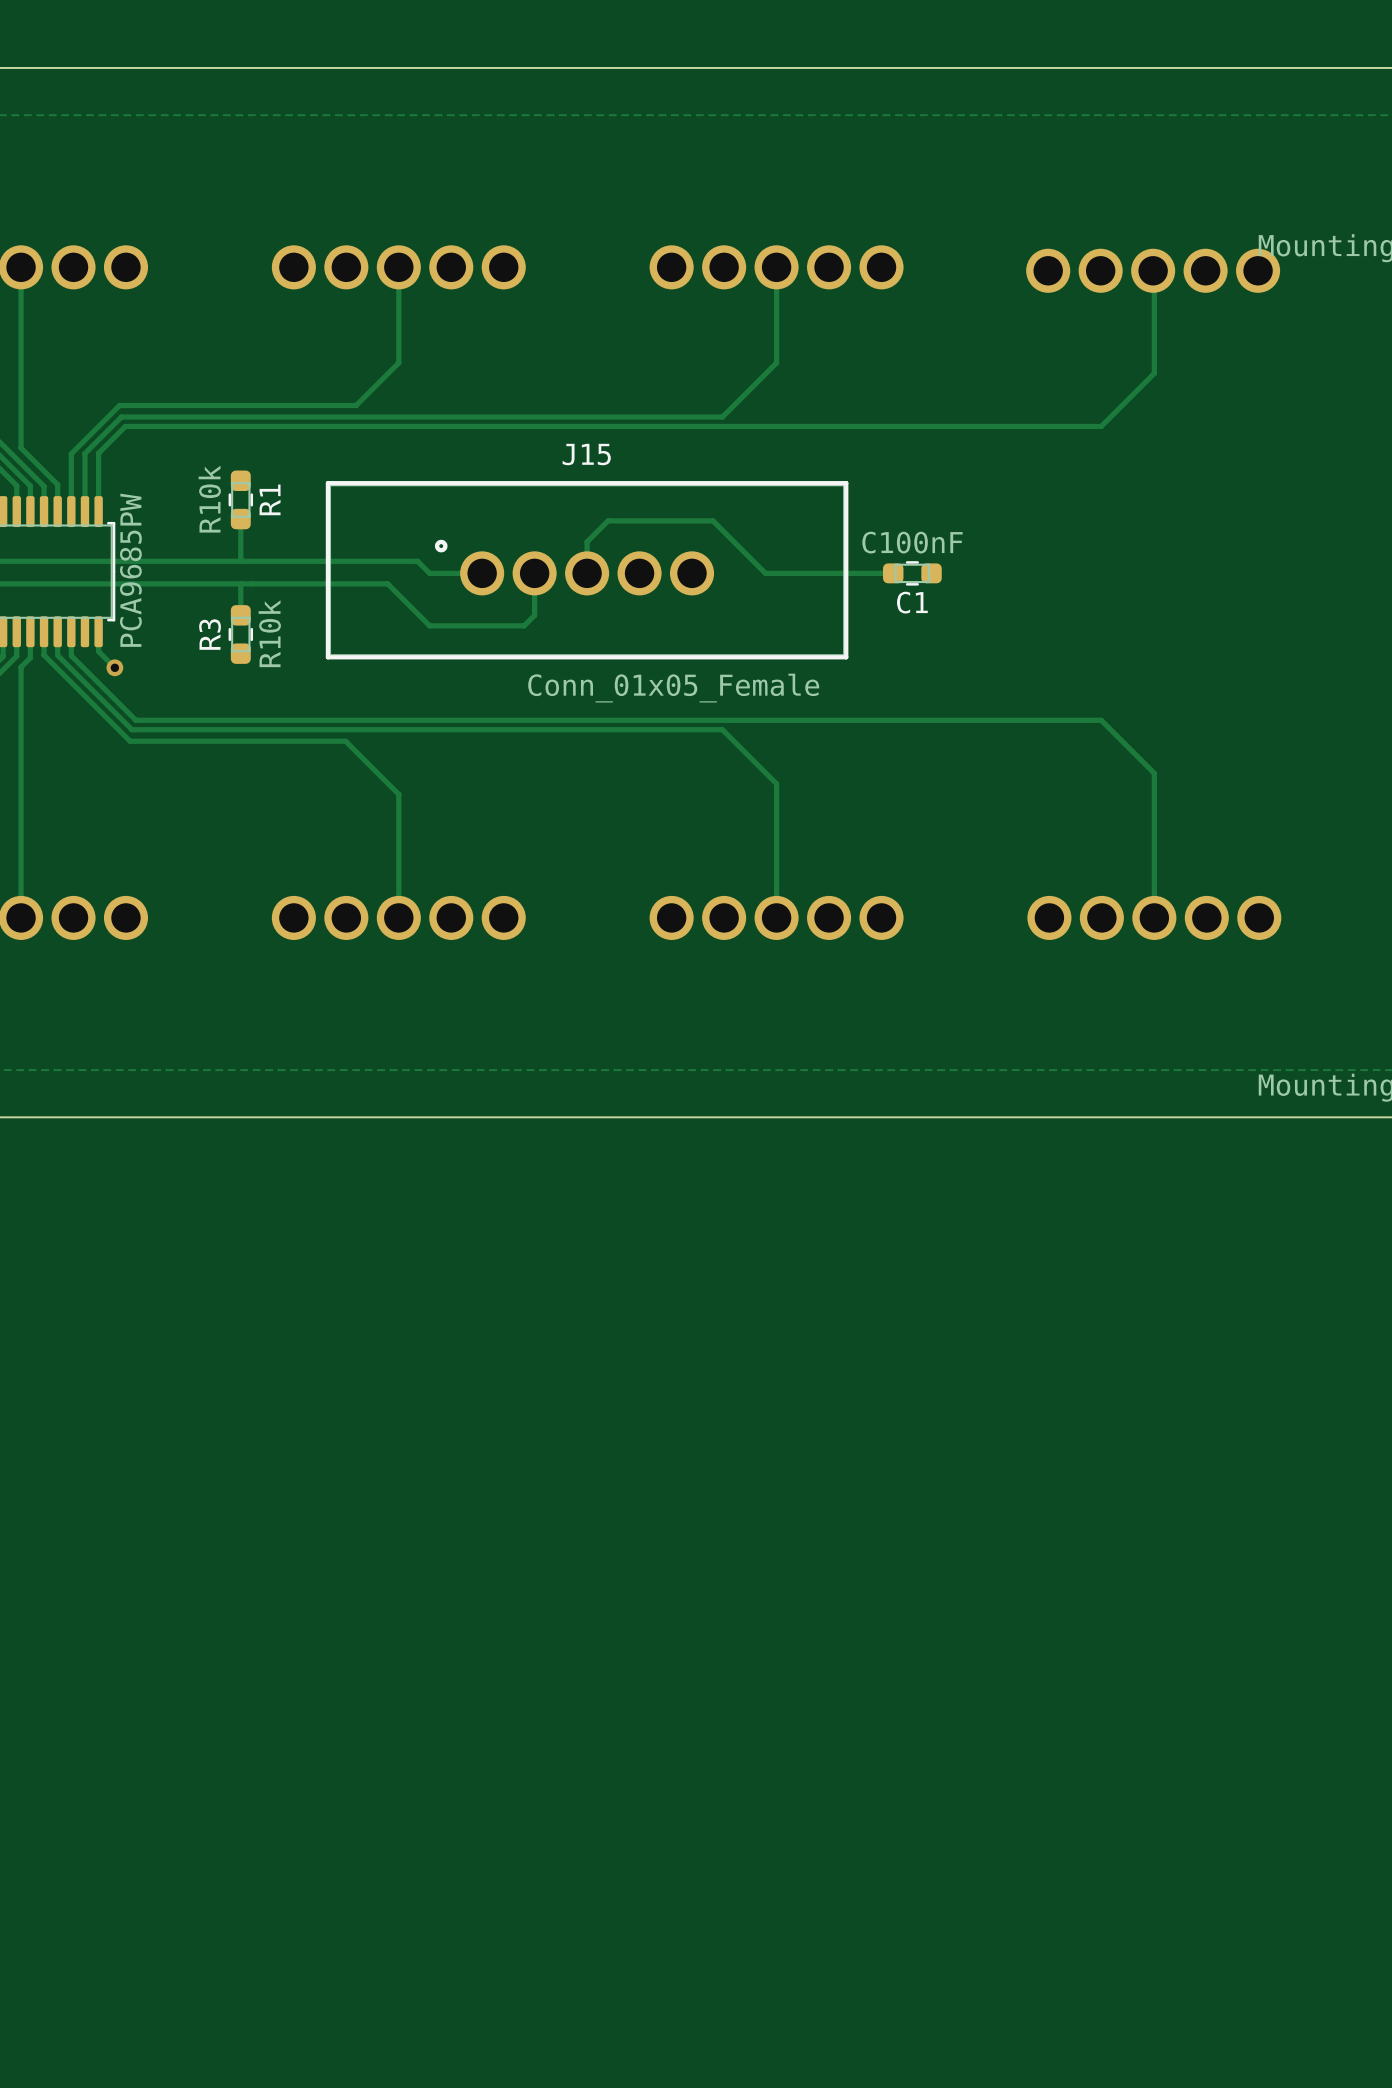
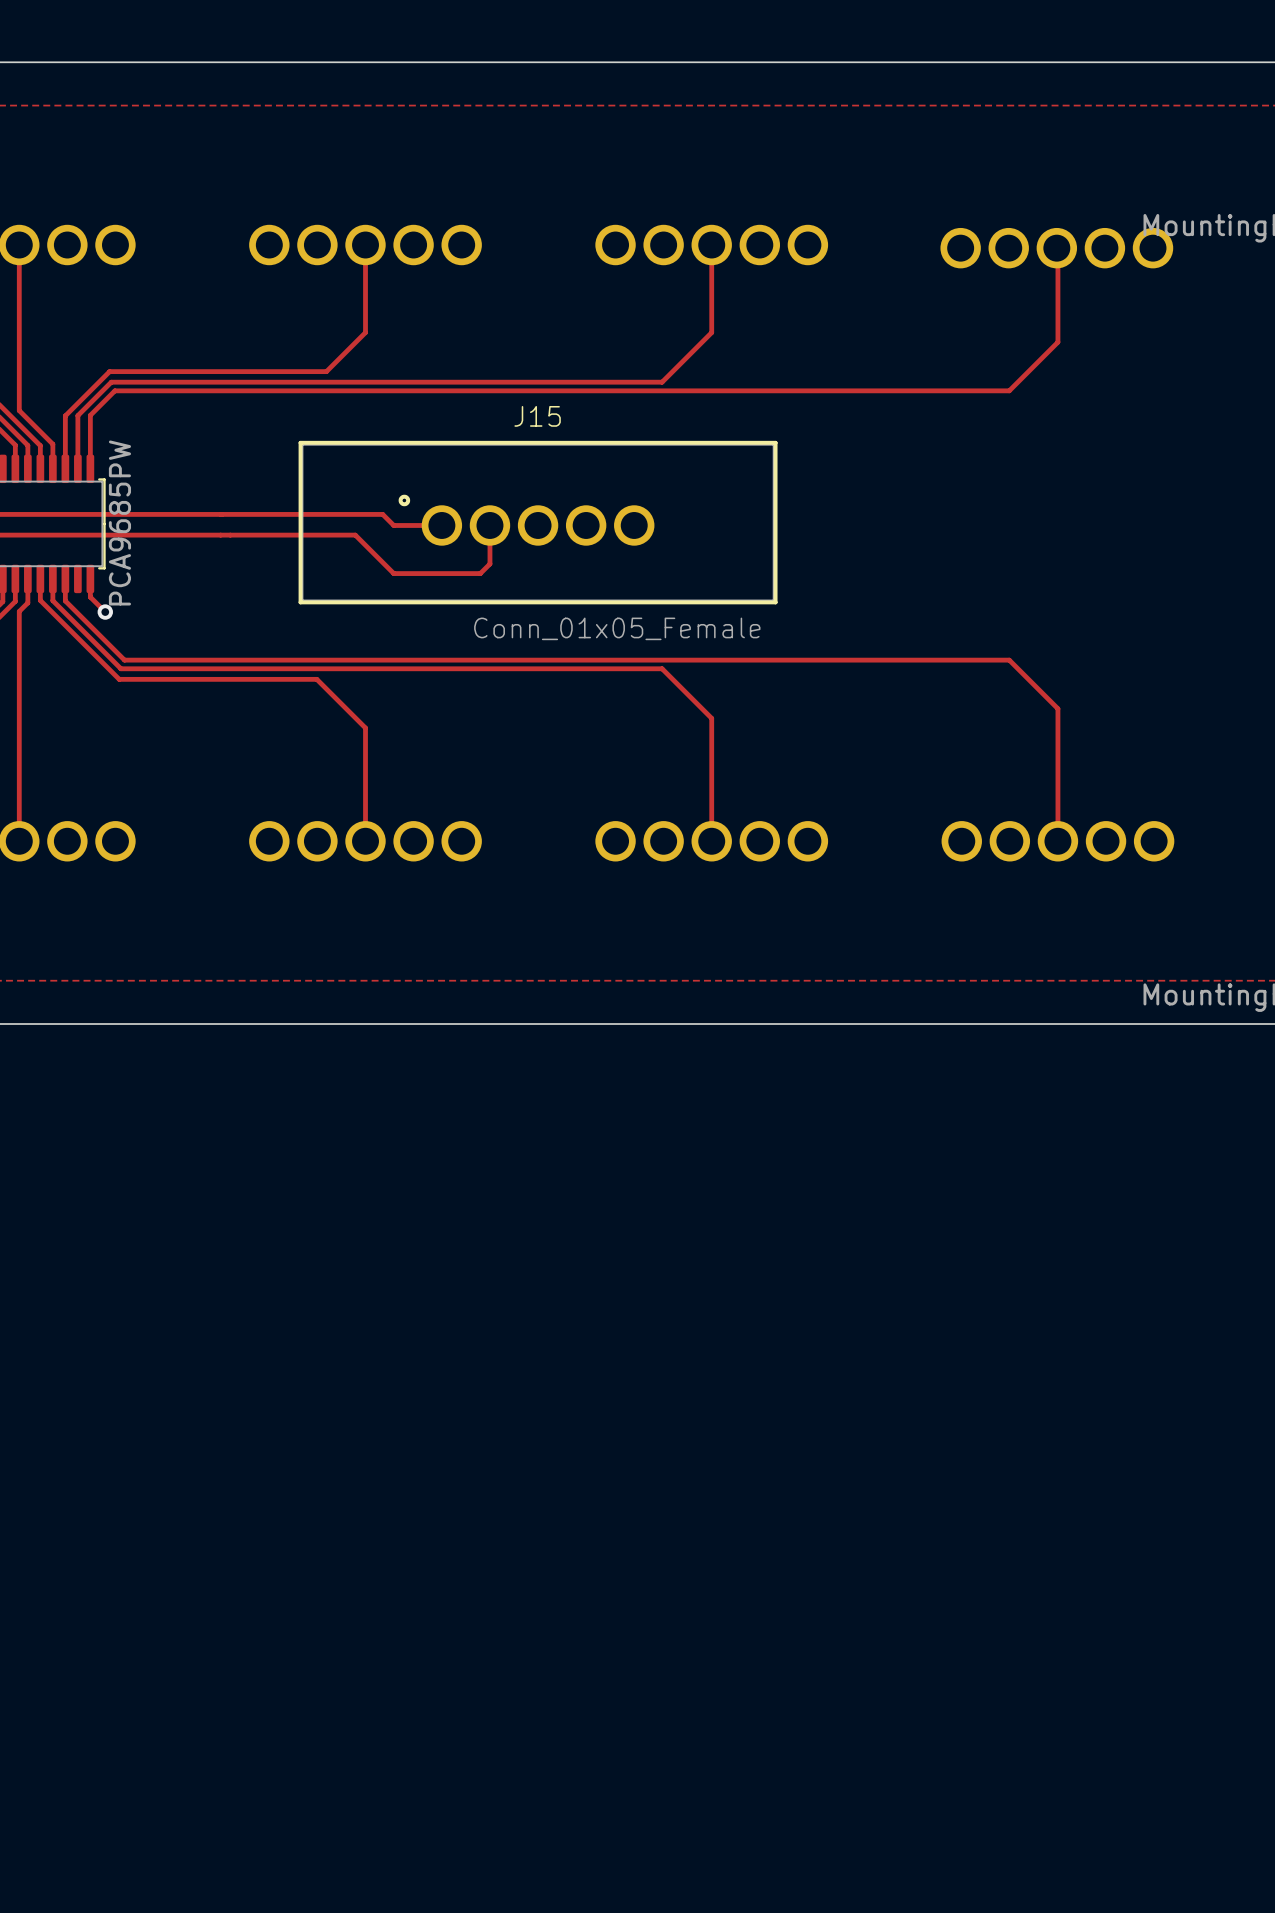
R1: R10k (240, 499) -> none
track: (240, 519) (240, 559) (242, 561) -> none
track: (587, 573) (587, 541) (608, 520) (713, 520) (765, 573) (893, 573) -> none
C1: C100nF (912, 573) -> none
track: (240, 583) (240, 615) -> none
R3: R10k (240, 634) -> none

